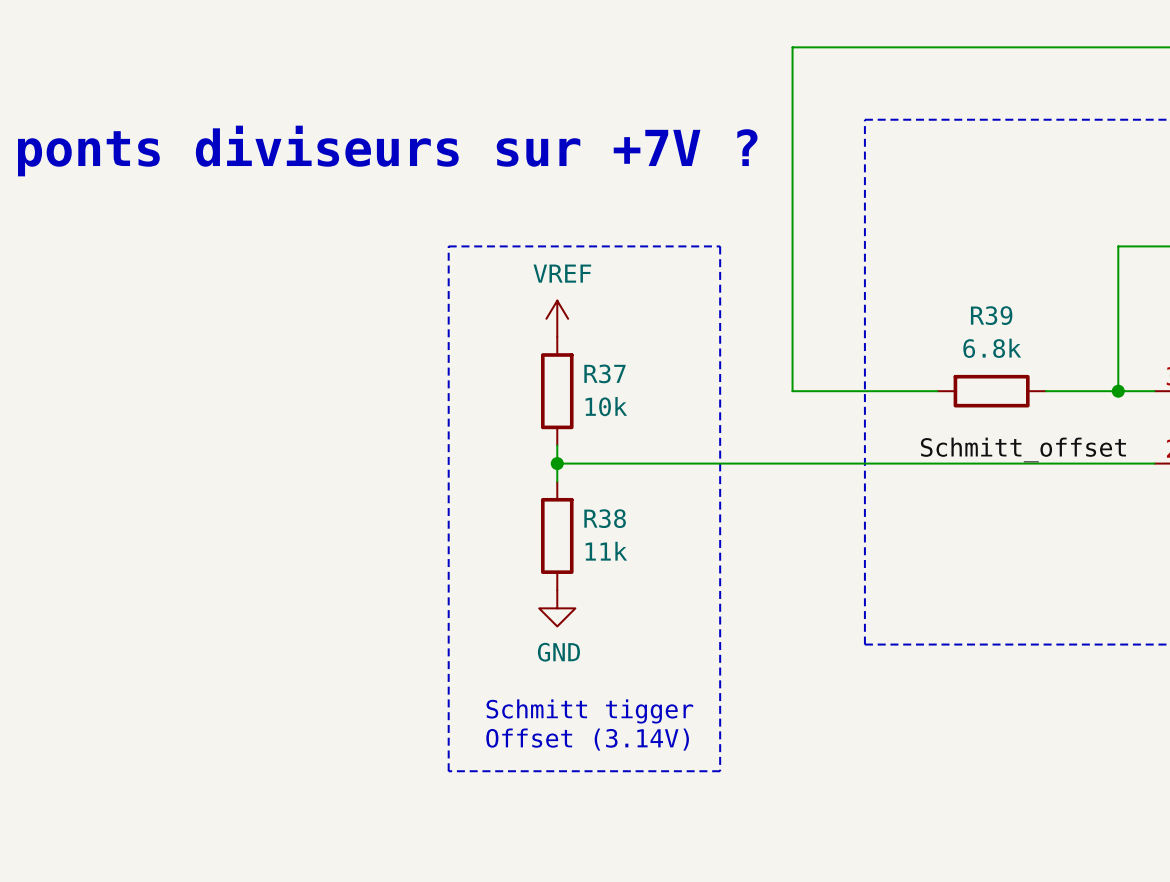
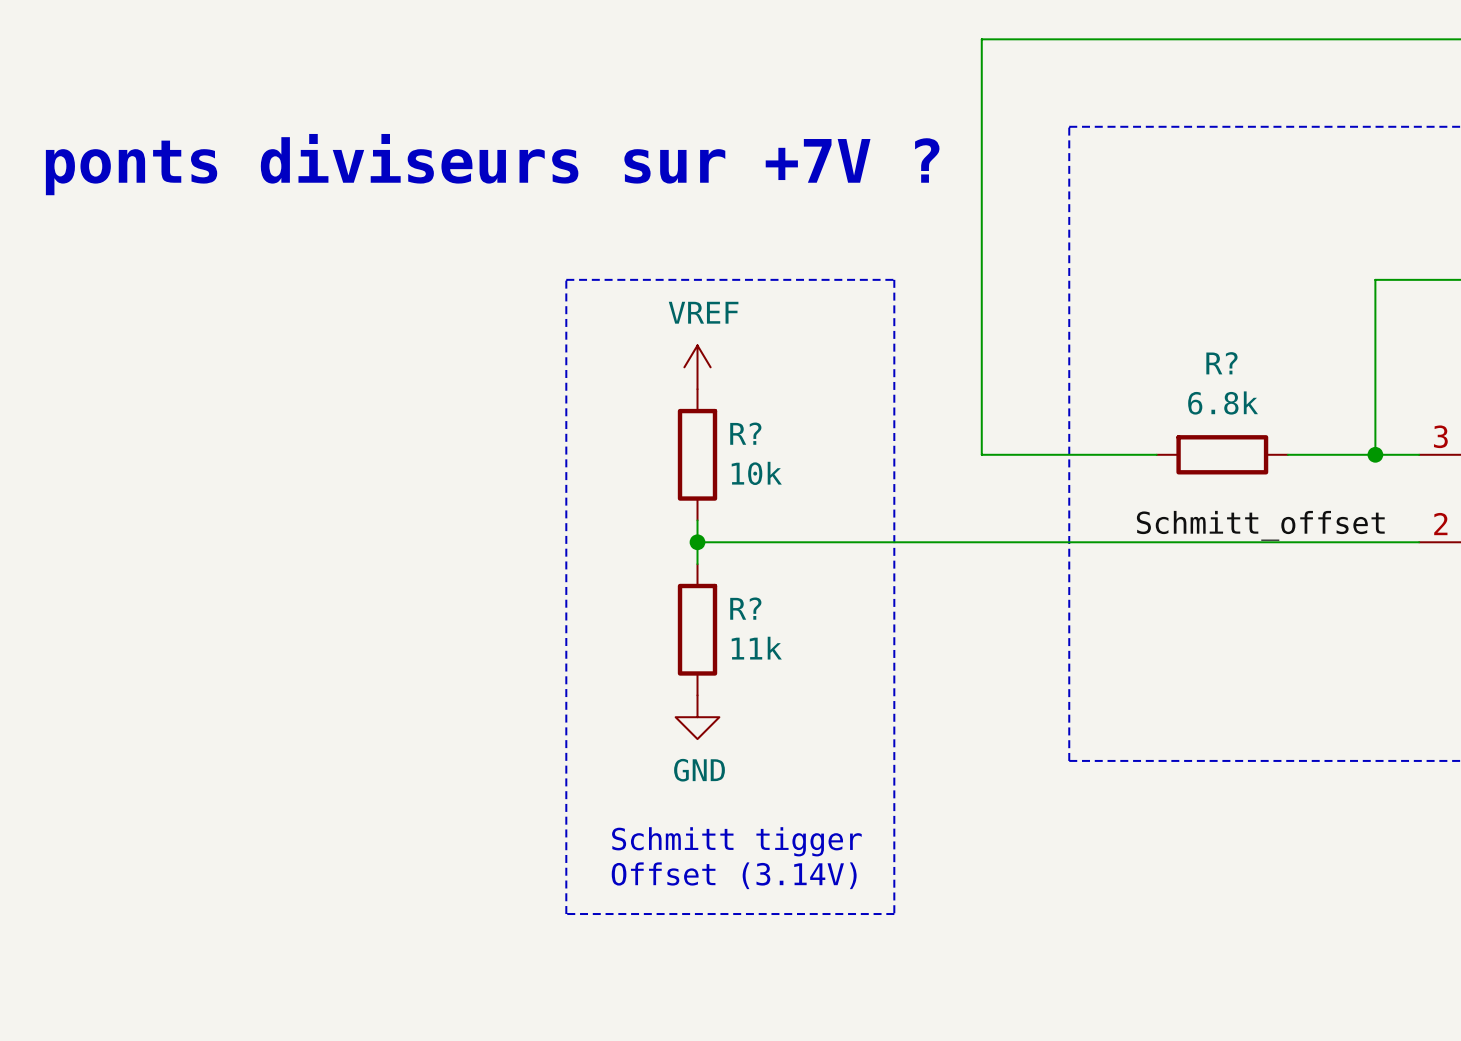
R39 name: R39 (991, 315) -> R? (1221, 363)
R37 name: R37 (604, 373) -> R? (745, 433)
R38 name: R38 (605, 518) -> R? (745, 608)

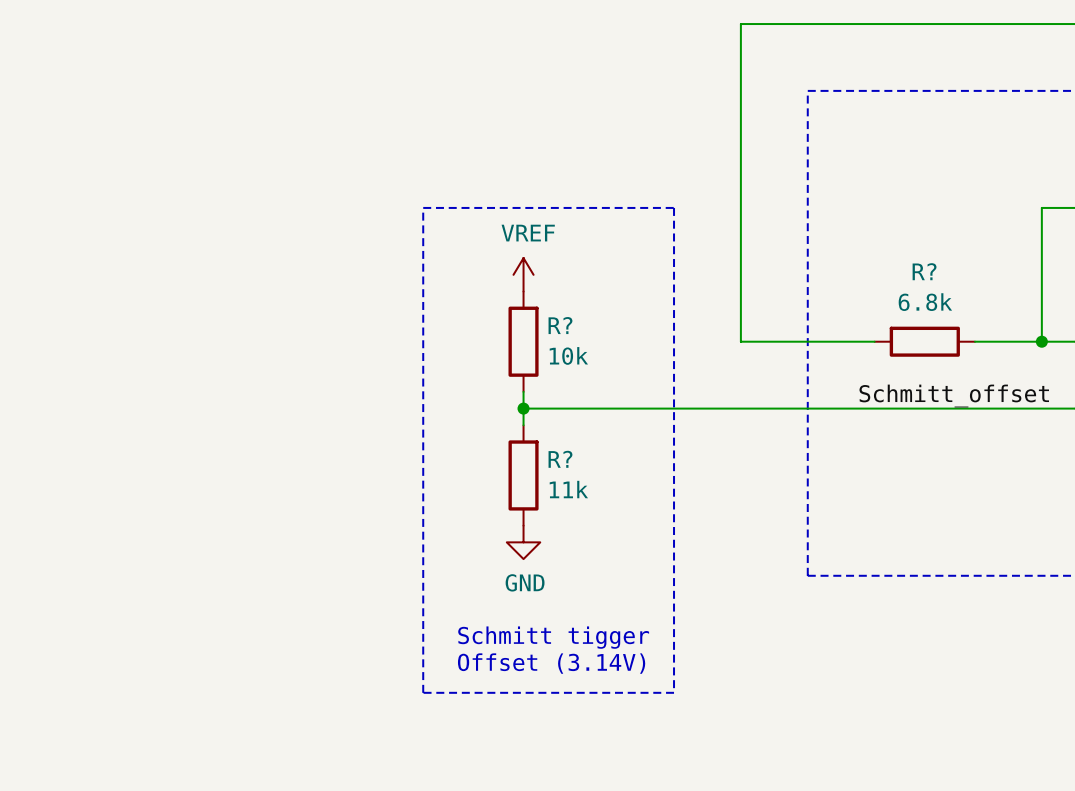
text: ponts diviseurs sur +7V ? (492, 164) -> none

